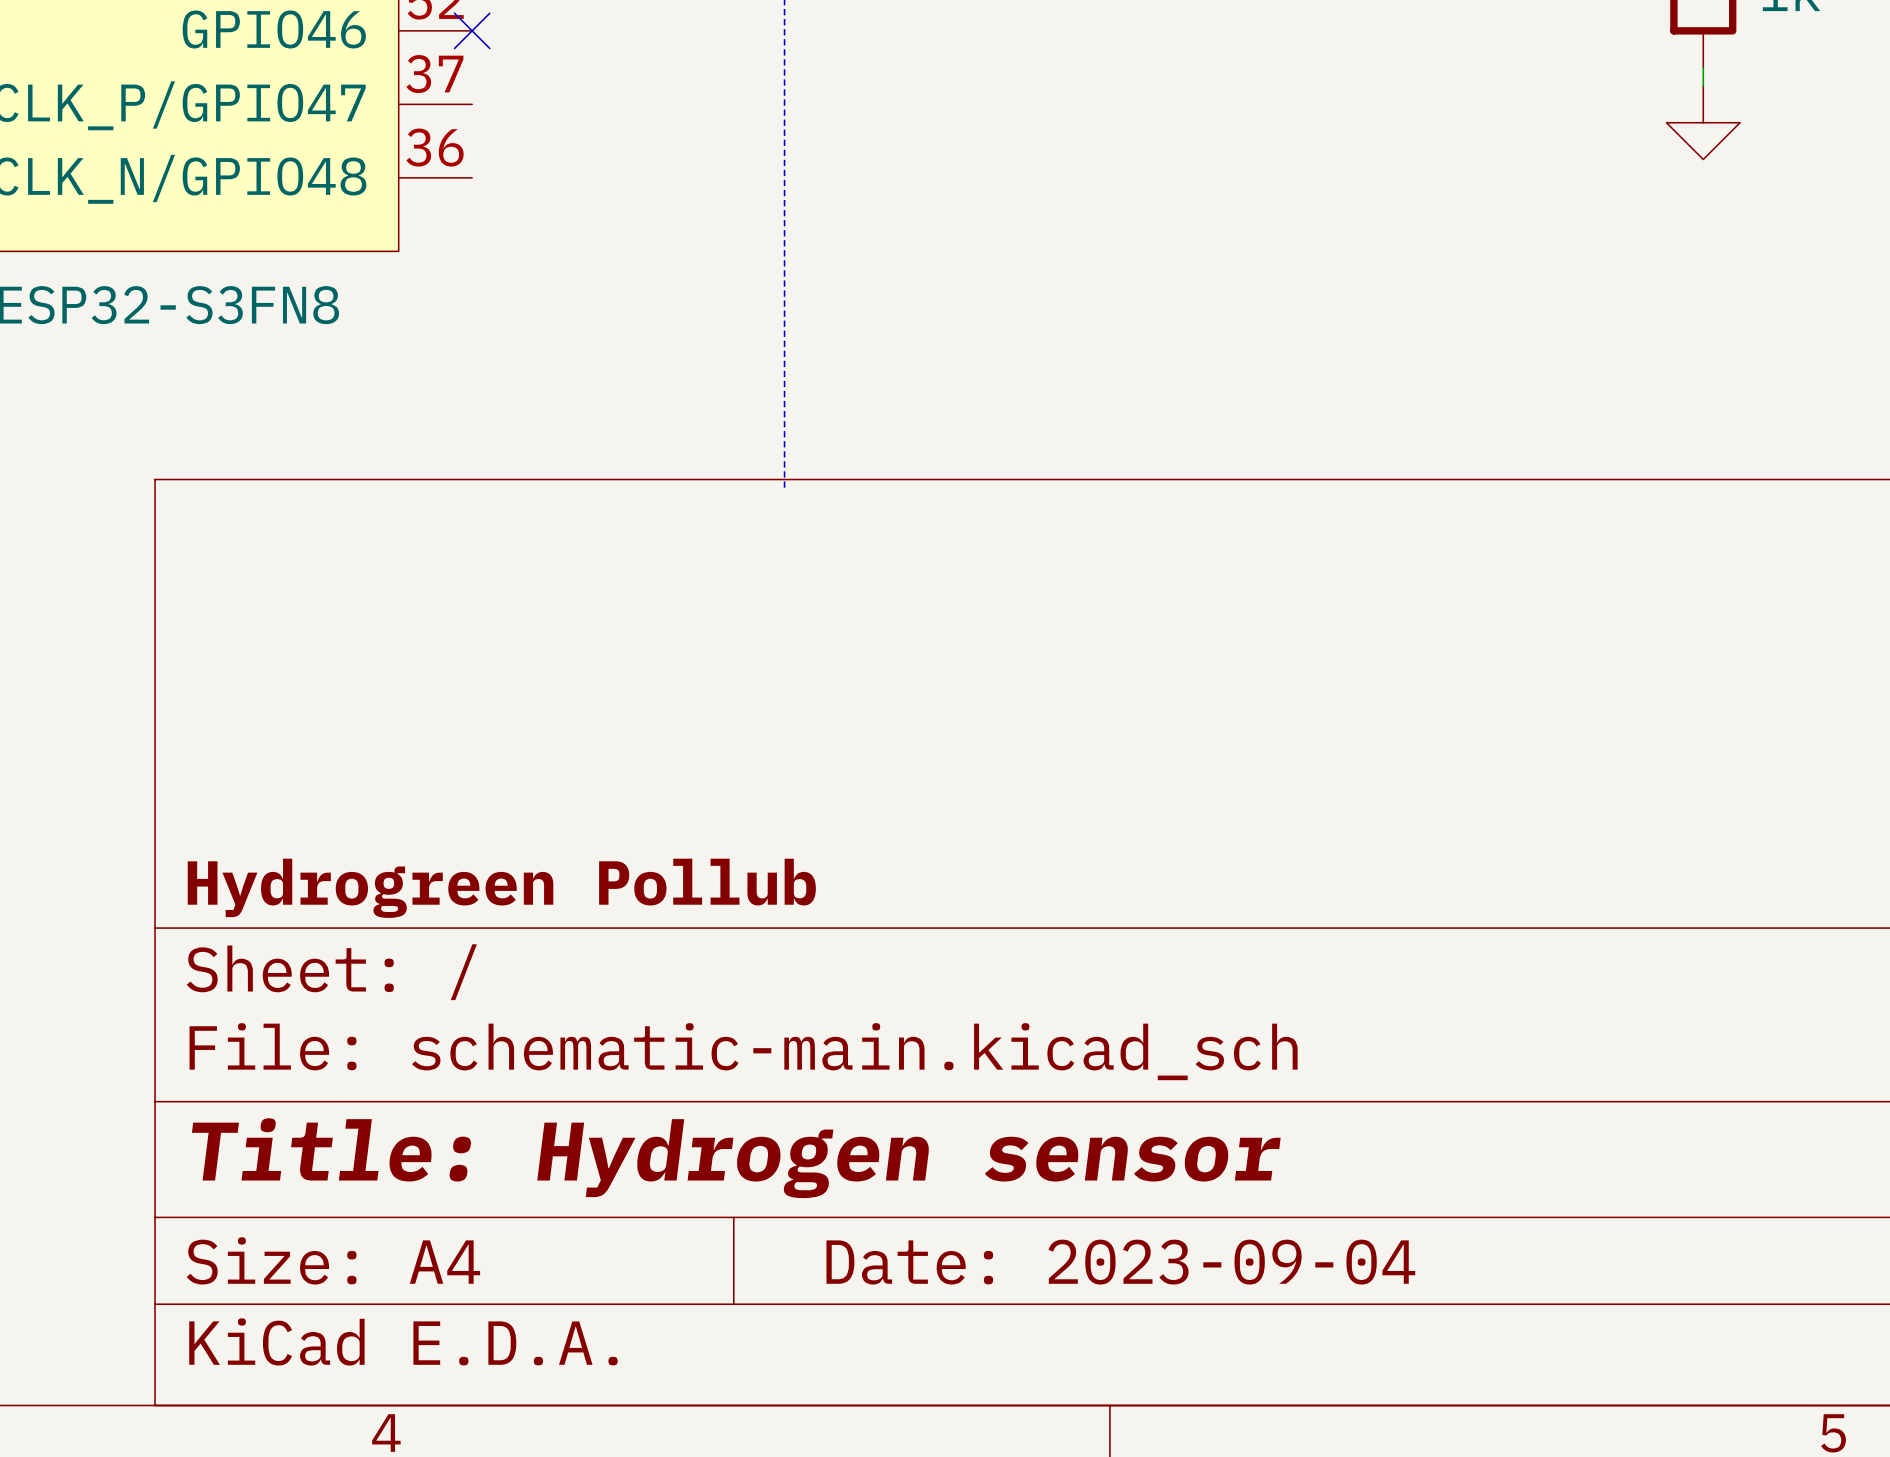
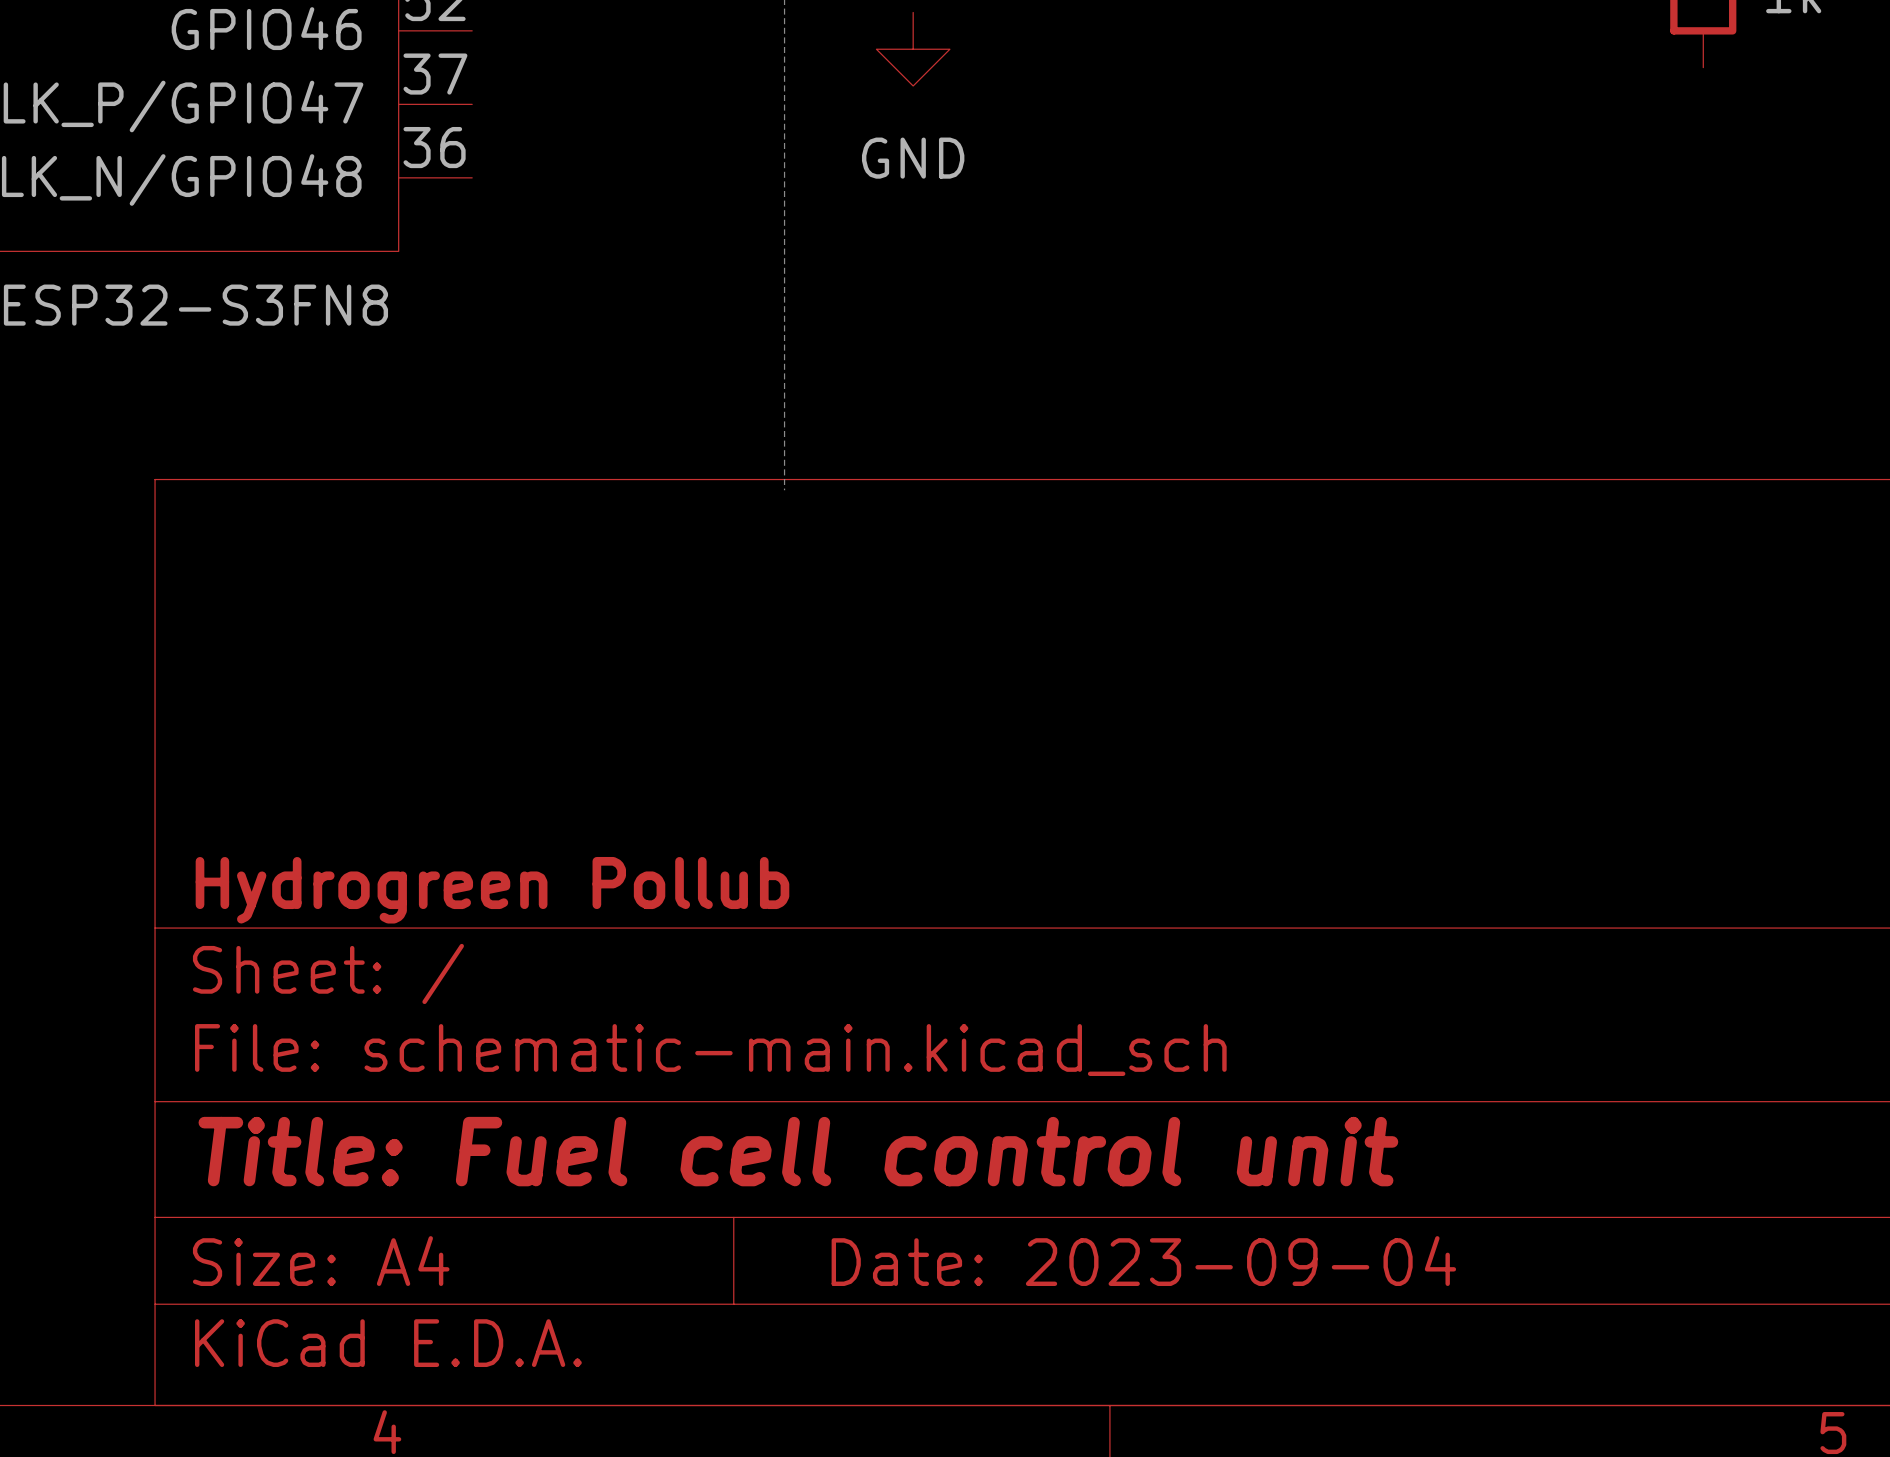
no-connect mark: (472, 30) -> none
power symbol: none -> GND (913, 49)
wire: (1703, 67) (1703, 85) -> none
power symbol: (1703, 122) -> none
title block: Title: Hydrogen sensor (736, 1158) -> Title: Fuel cell control unit (798, 1151)

